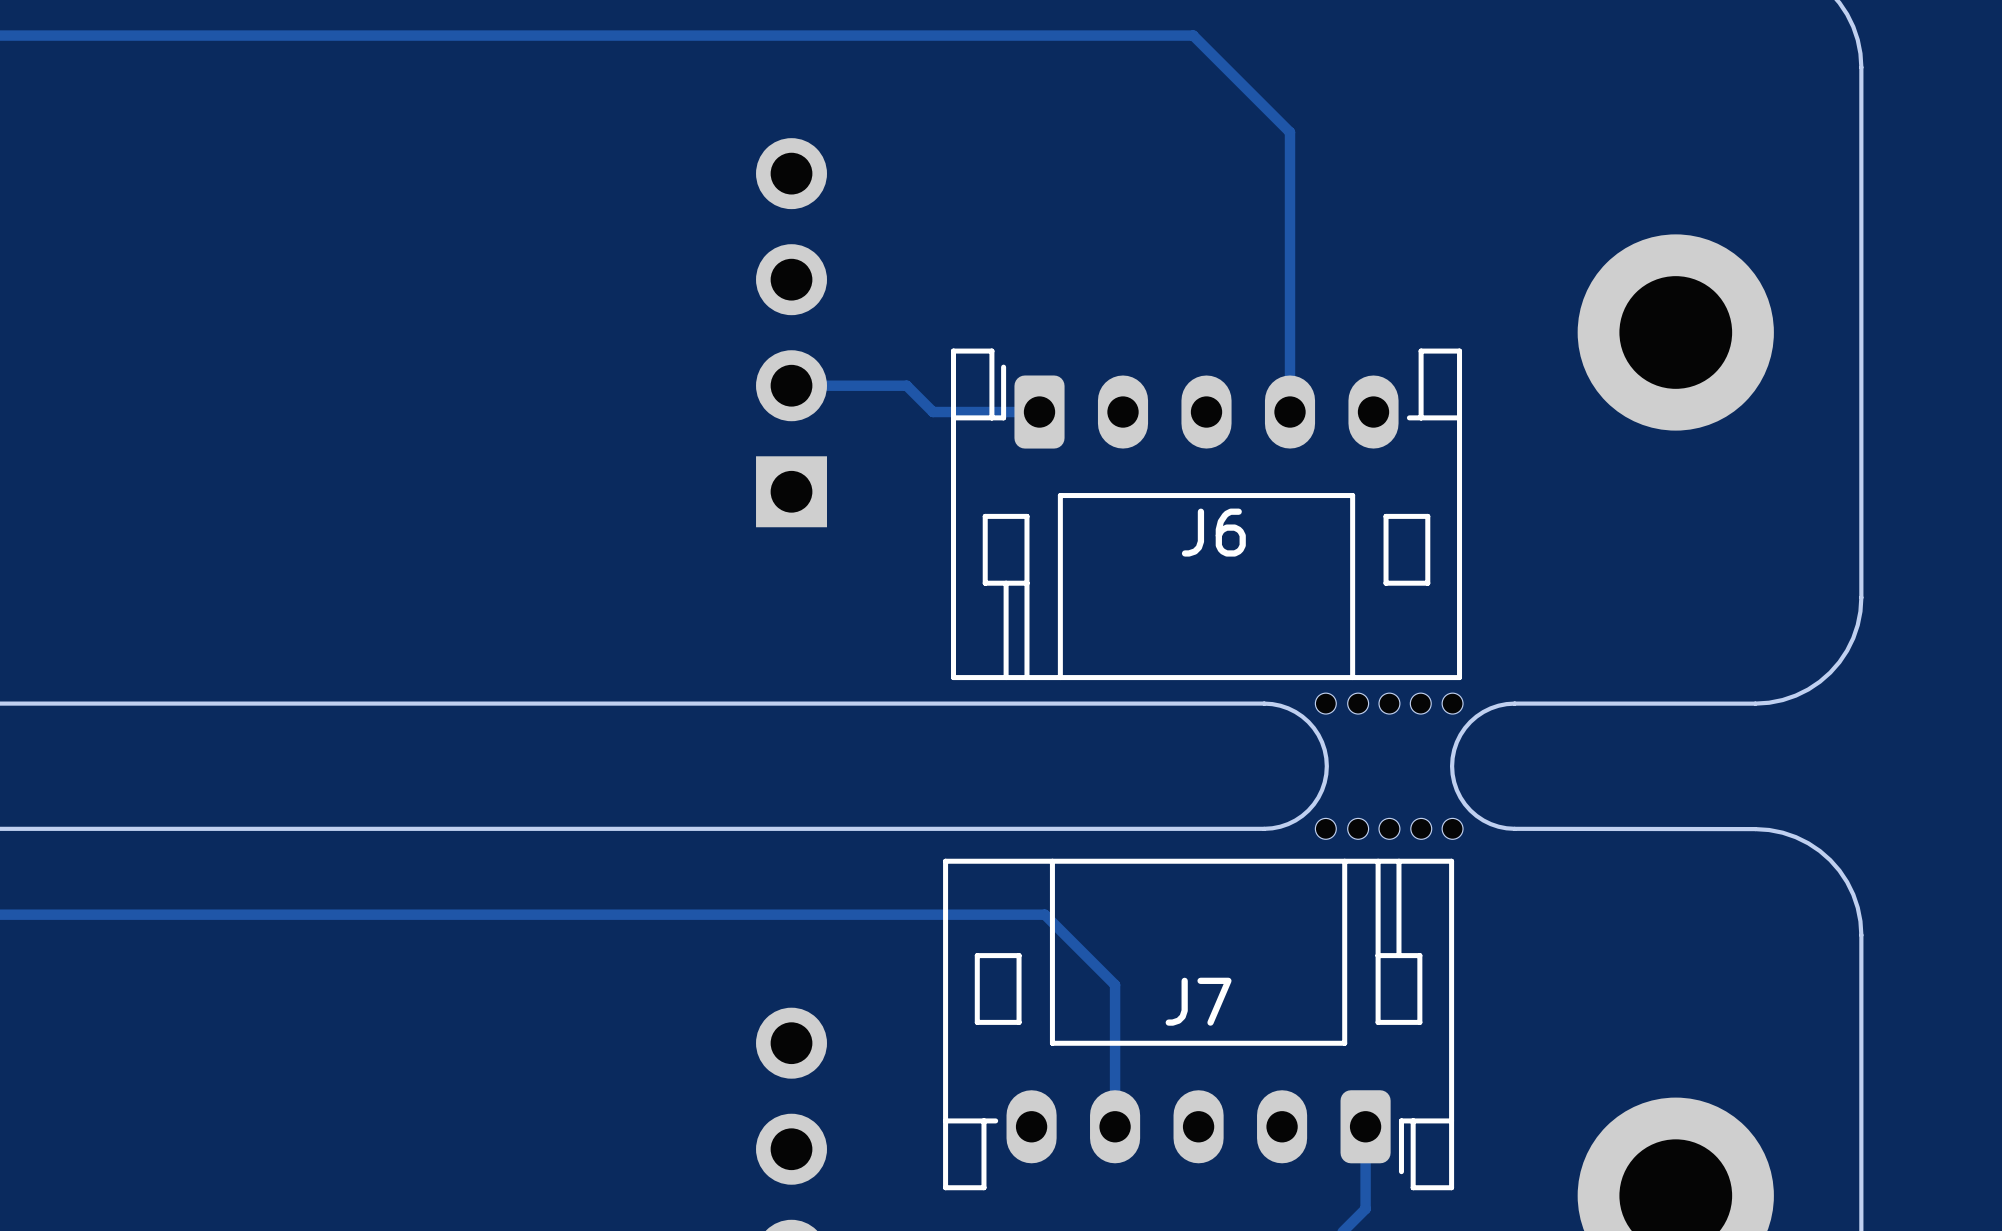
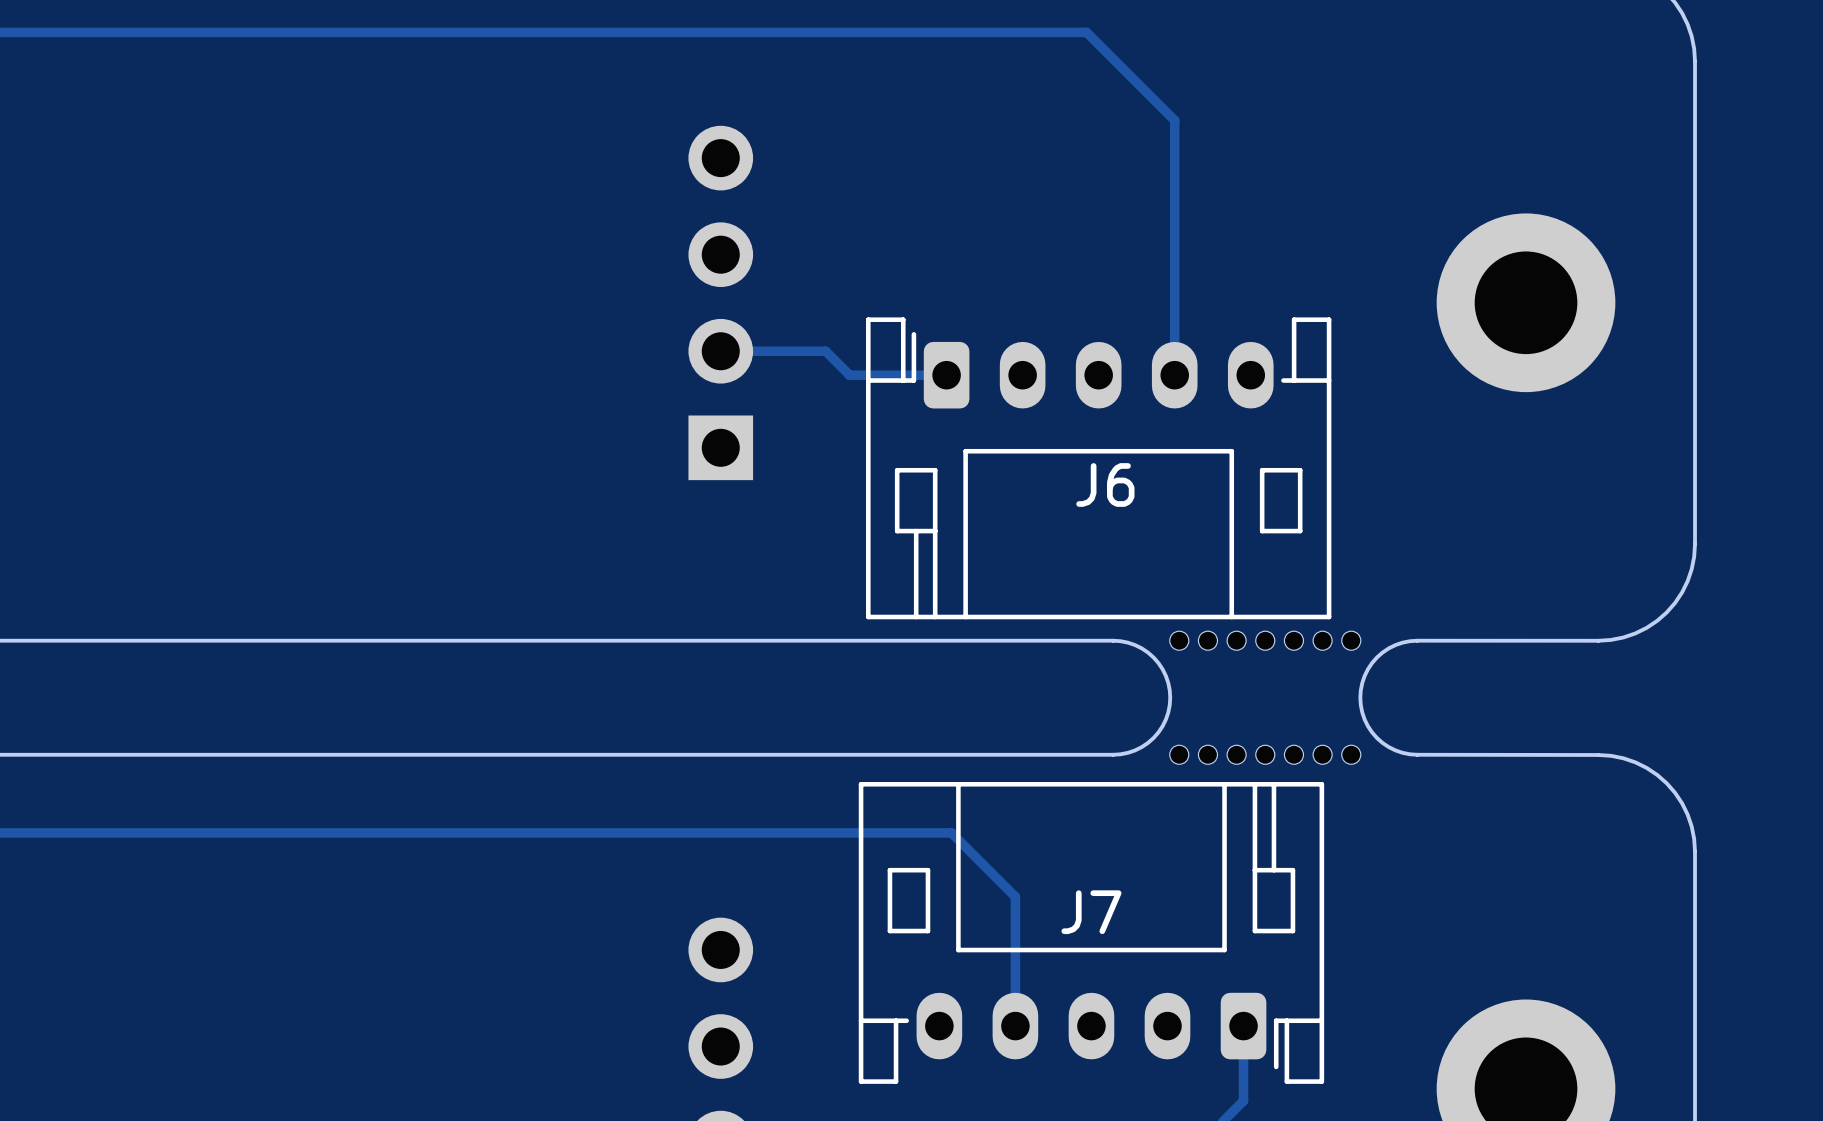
part footprint: [1262, 693, 1517, 840] -> [1111, 631, 1420, 765]
board edge: (1264, 703) (1222, 703) -> none
board edge: (1755, 703) (1514, 703) -> (1598, 640) (1417, 640)
board edge: (1264, 828) (1222, 828) -> none
board edge: (1514, 828) (1755, 829) -> (1417, 754) (1598, 754)

